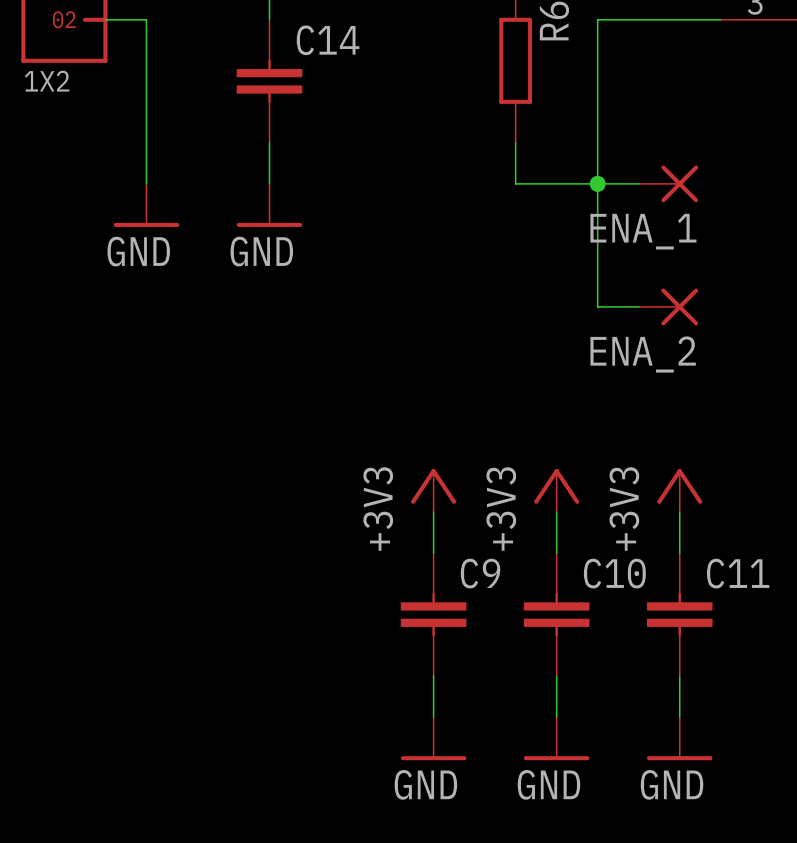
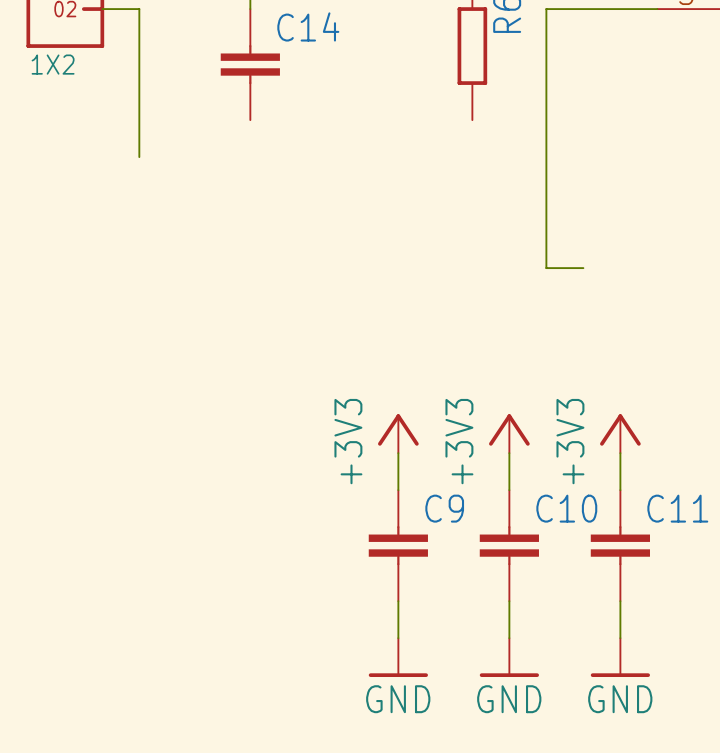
wire: (269, 142) (269, 183) -> none
wire: (515, 142) (515, 183) (638, 183) -> none
junction: (597, 183) -> none
ENA_1: (668, 183) -> none
power symbol: GND (146, 205) -> none
power symbol: GND (269, 205) -> none
ENA_2: (668, 306) -> none

